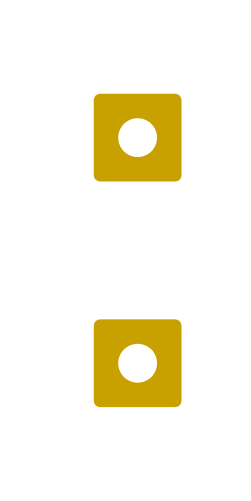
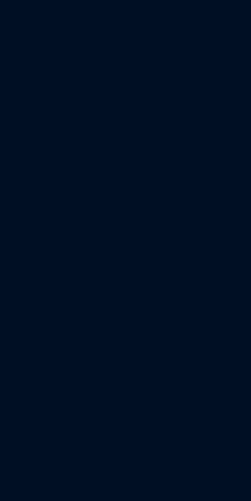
part: (137, 137) -> none
part: (137, 363) -> none

